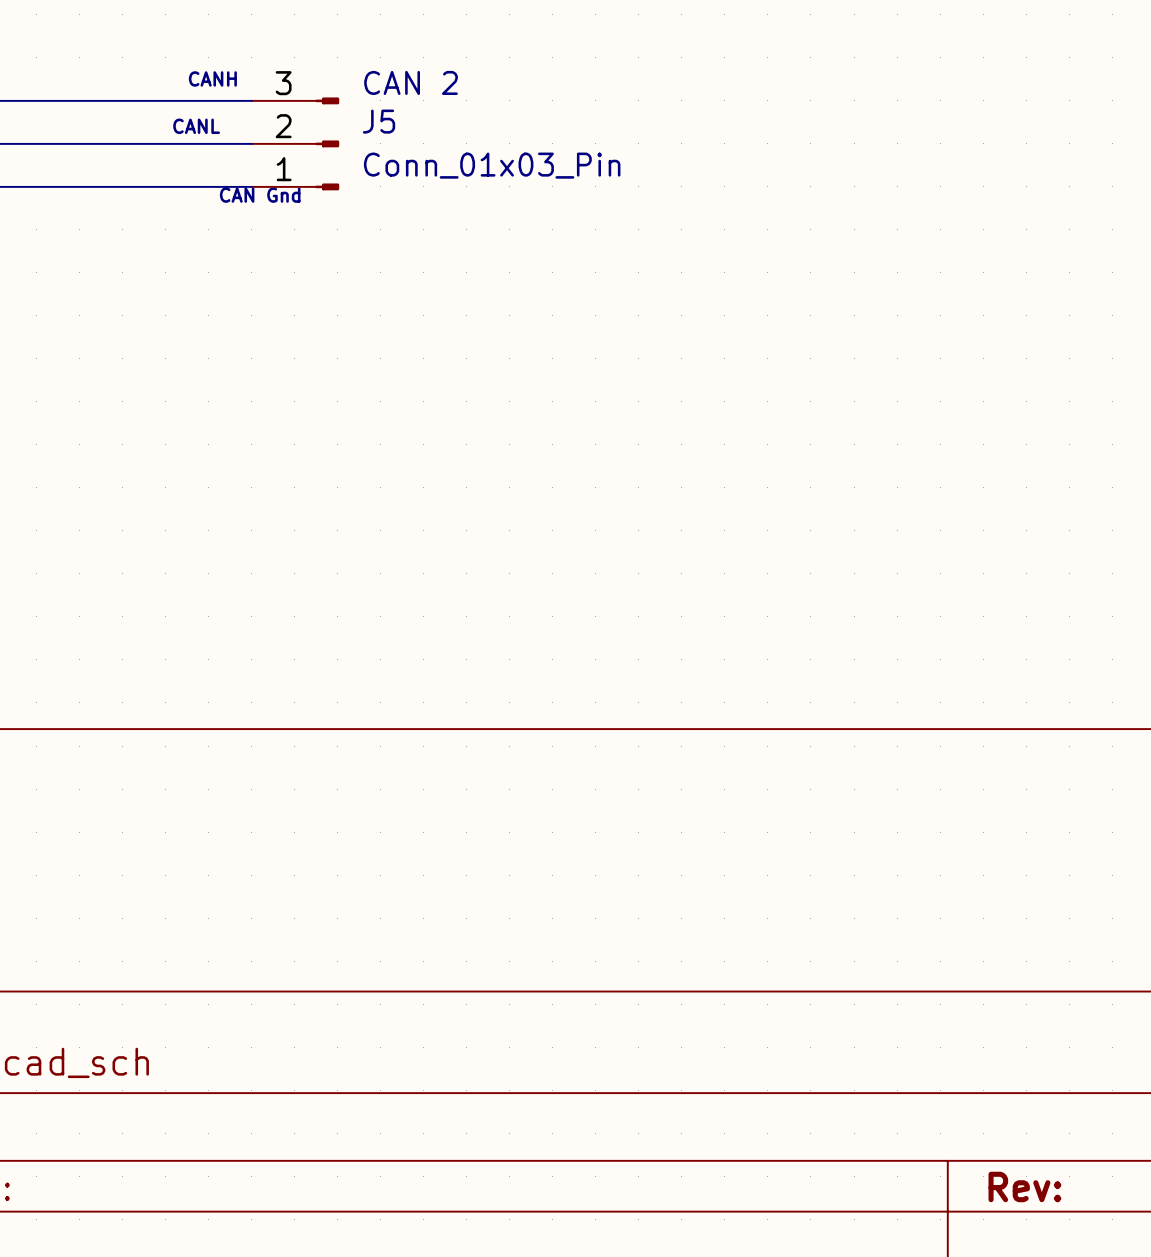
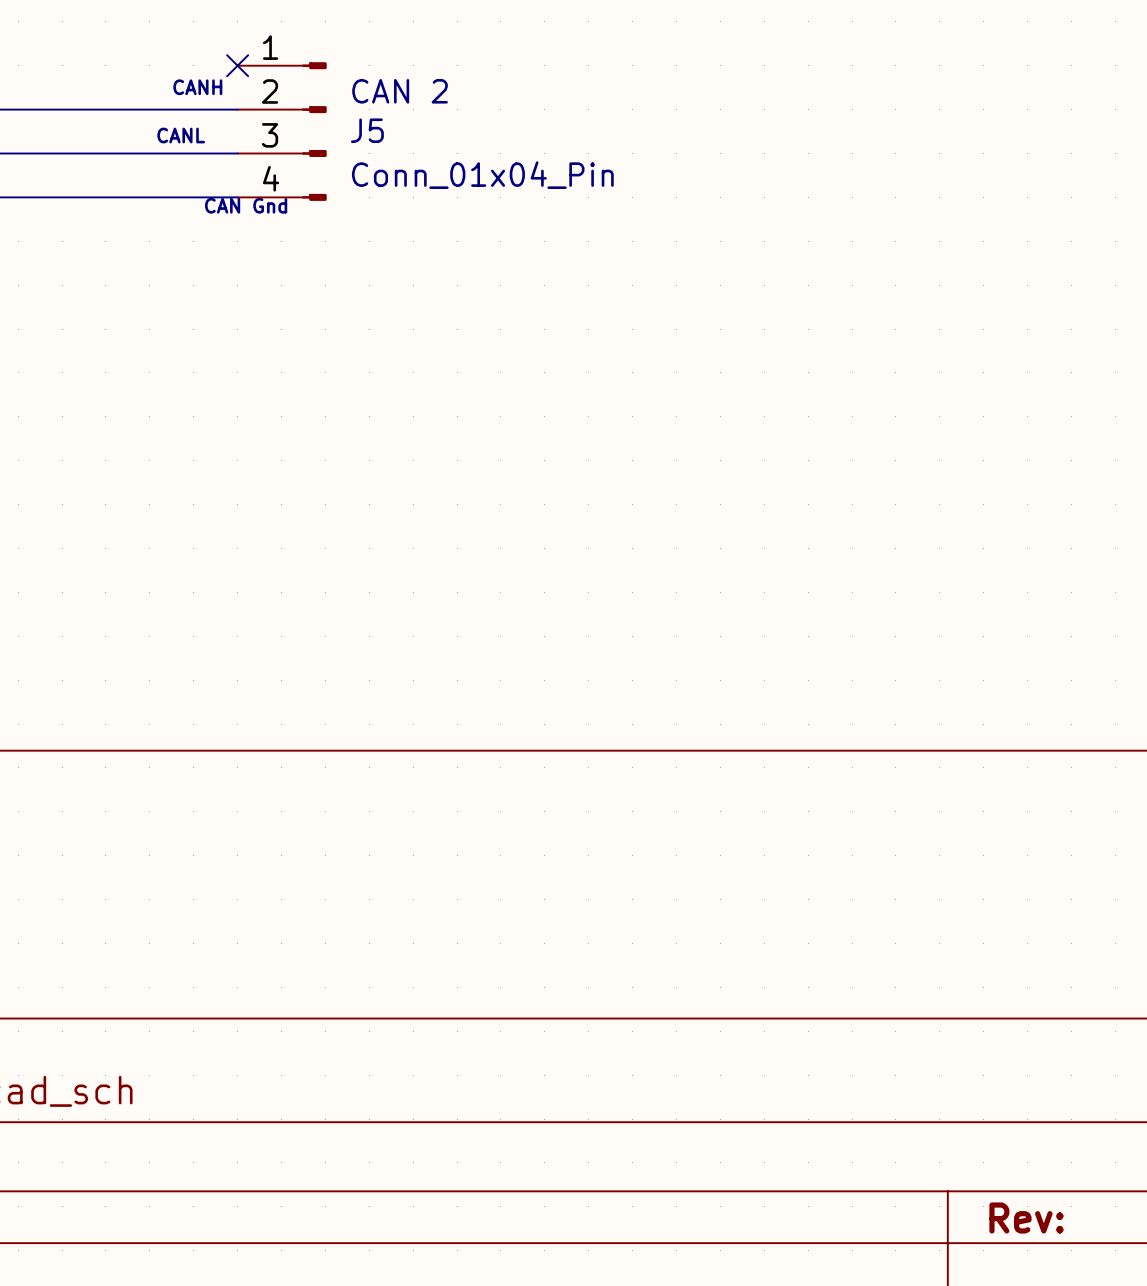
no-connect mark: none -> (237, 65)
J5 symbol: [251, 97, 340, 191] -> [237, 62, 327, 201]
J5 value: Conn_01x03_Pin (492, 165) -> Conn_01x04_Pin (482, 175)

